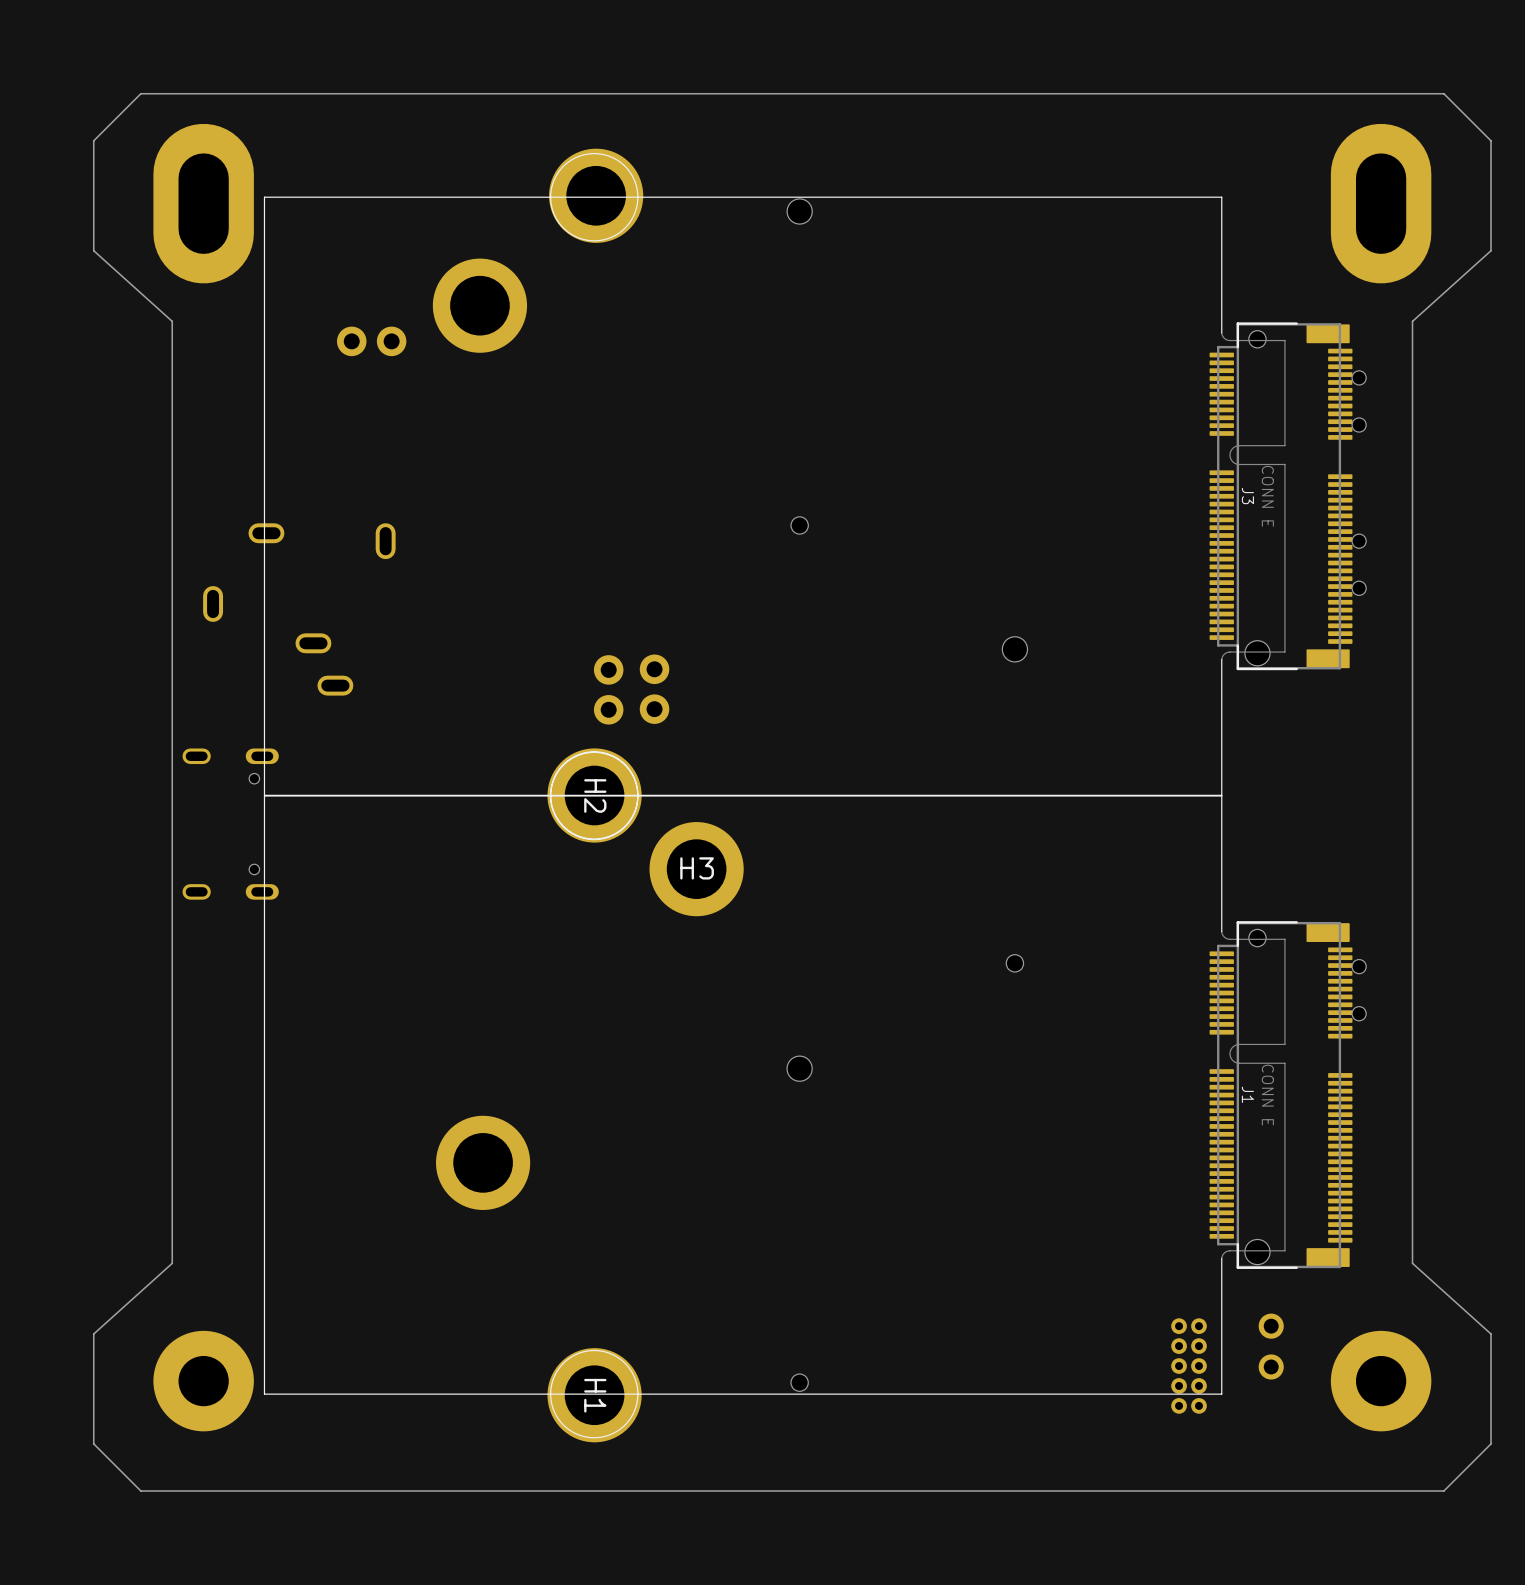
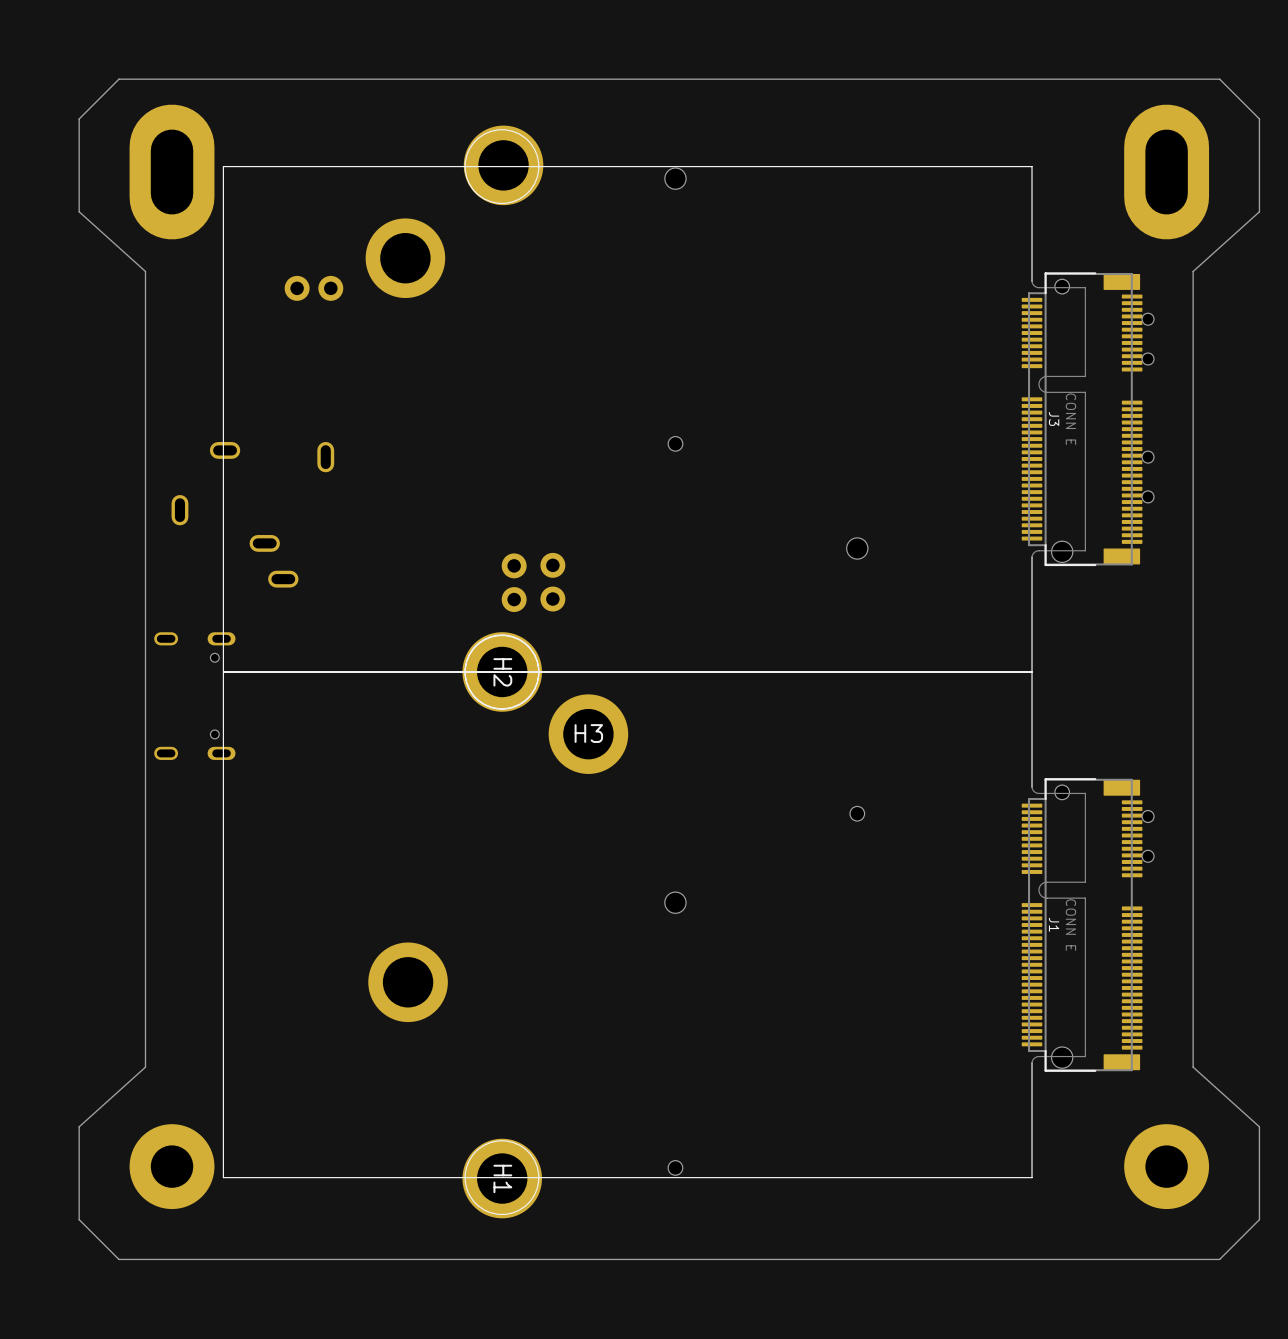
part: (1271, 1326) -> none
part: (1189, 1366) -> none
part: (1271, 1366) -> none

